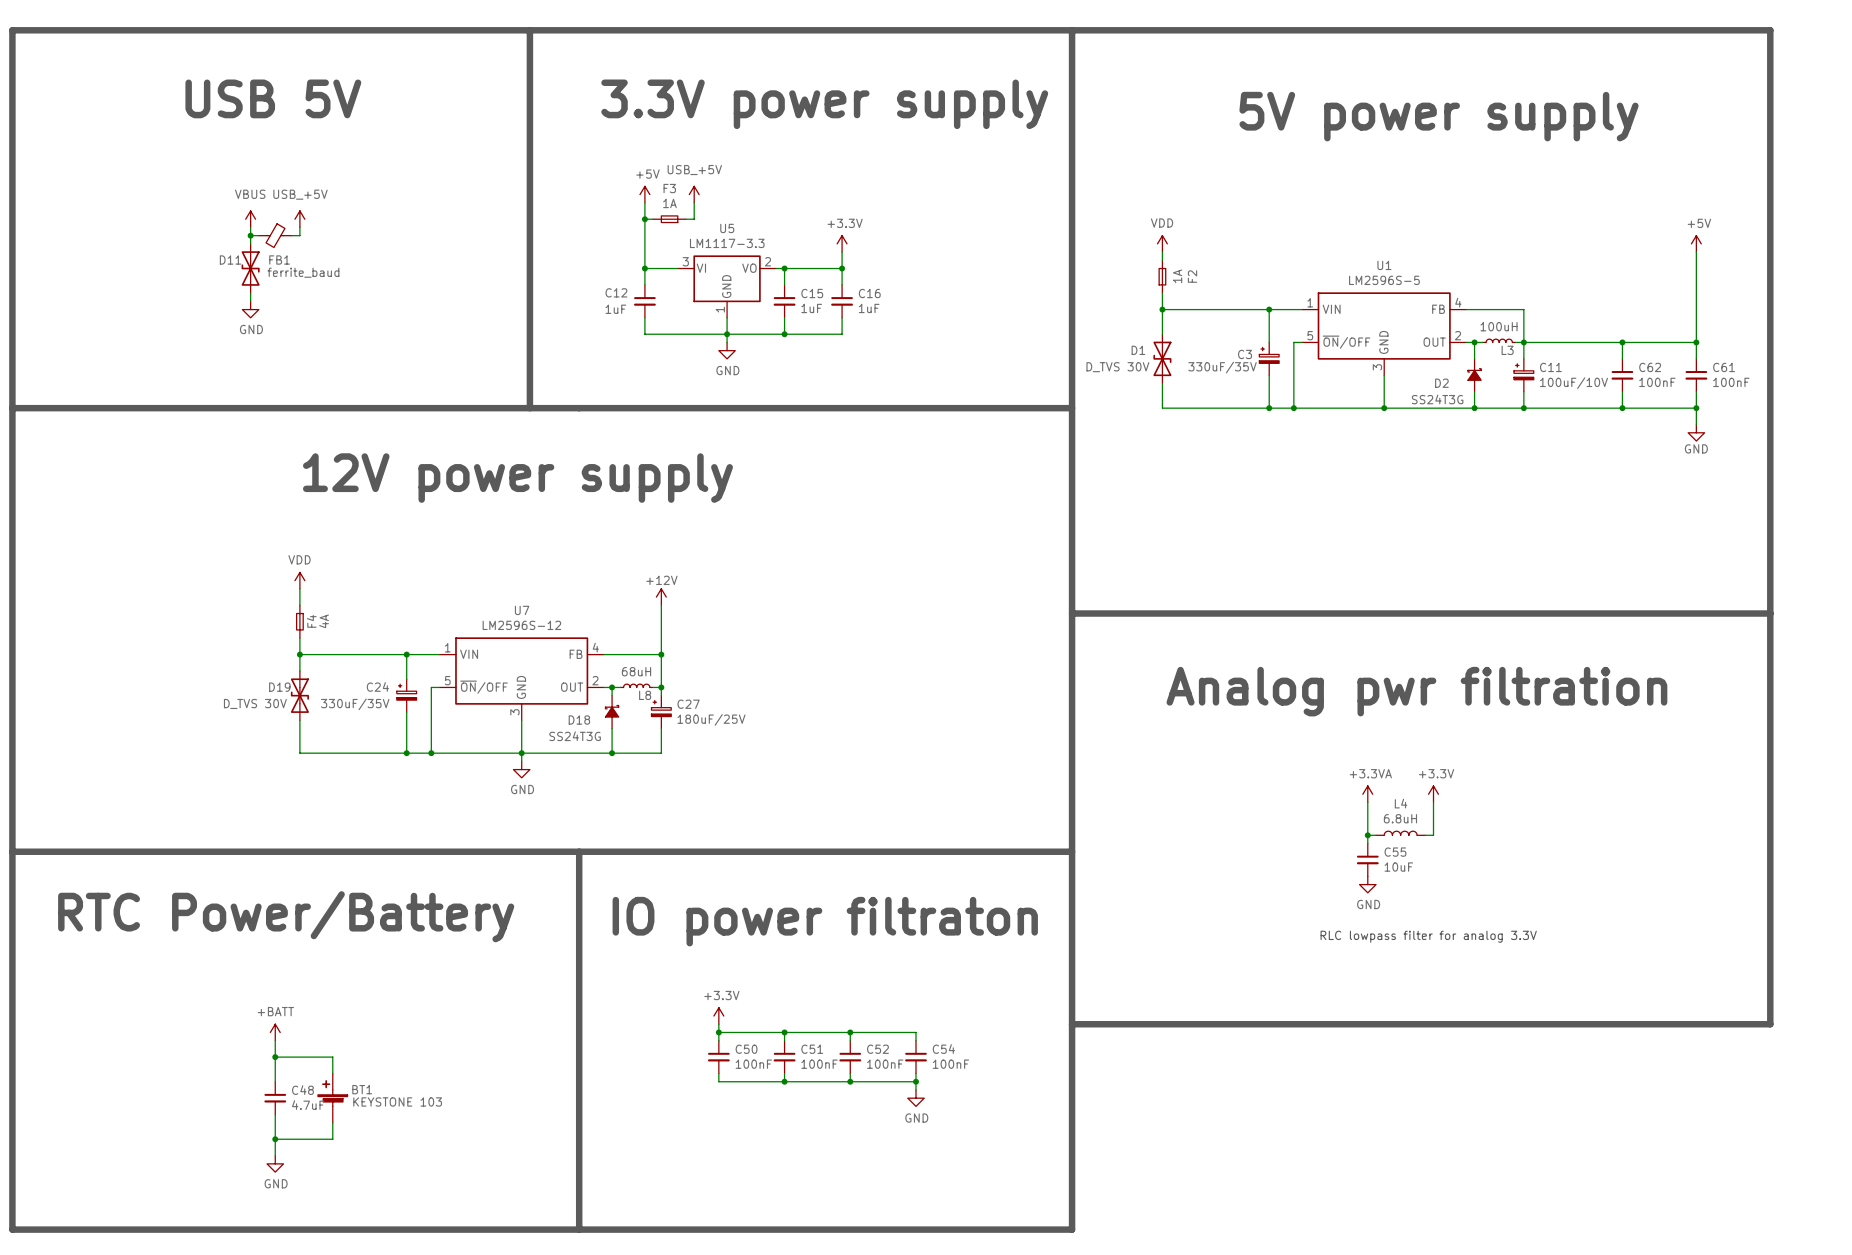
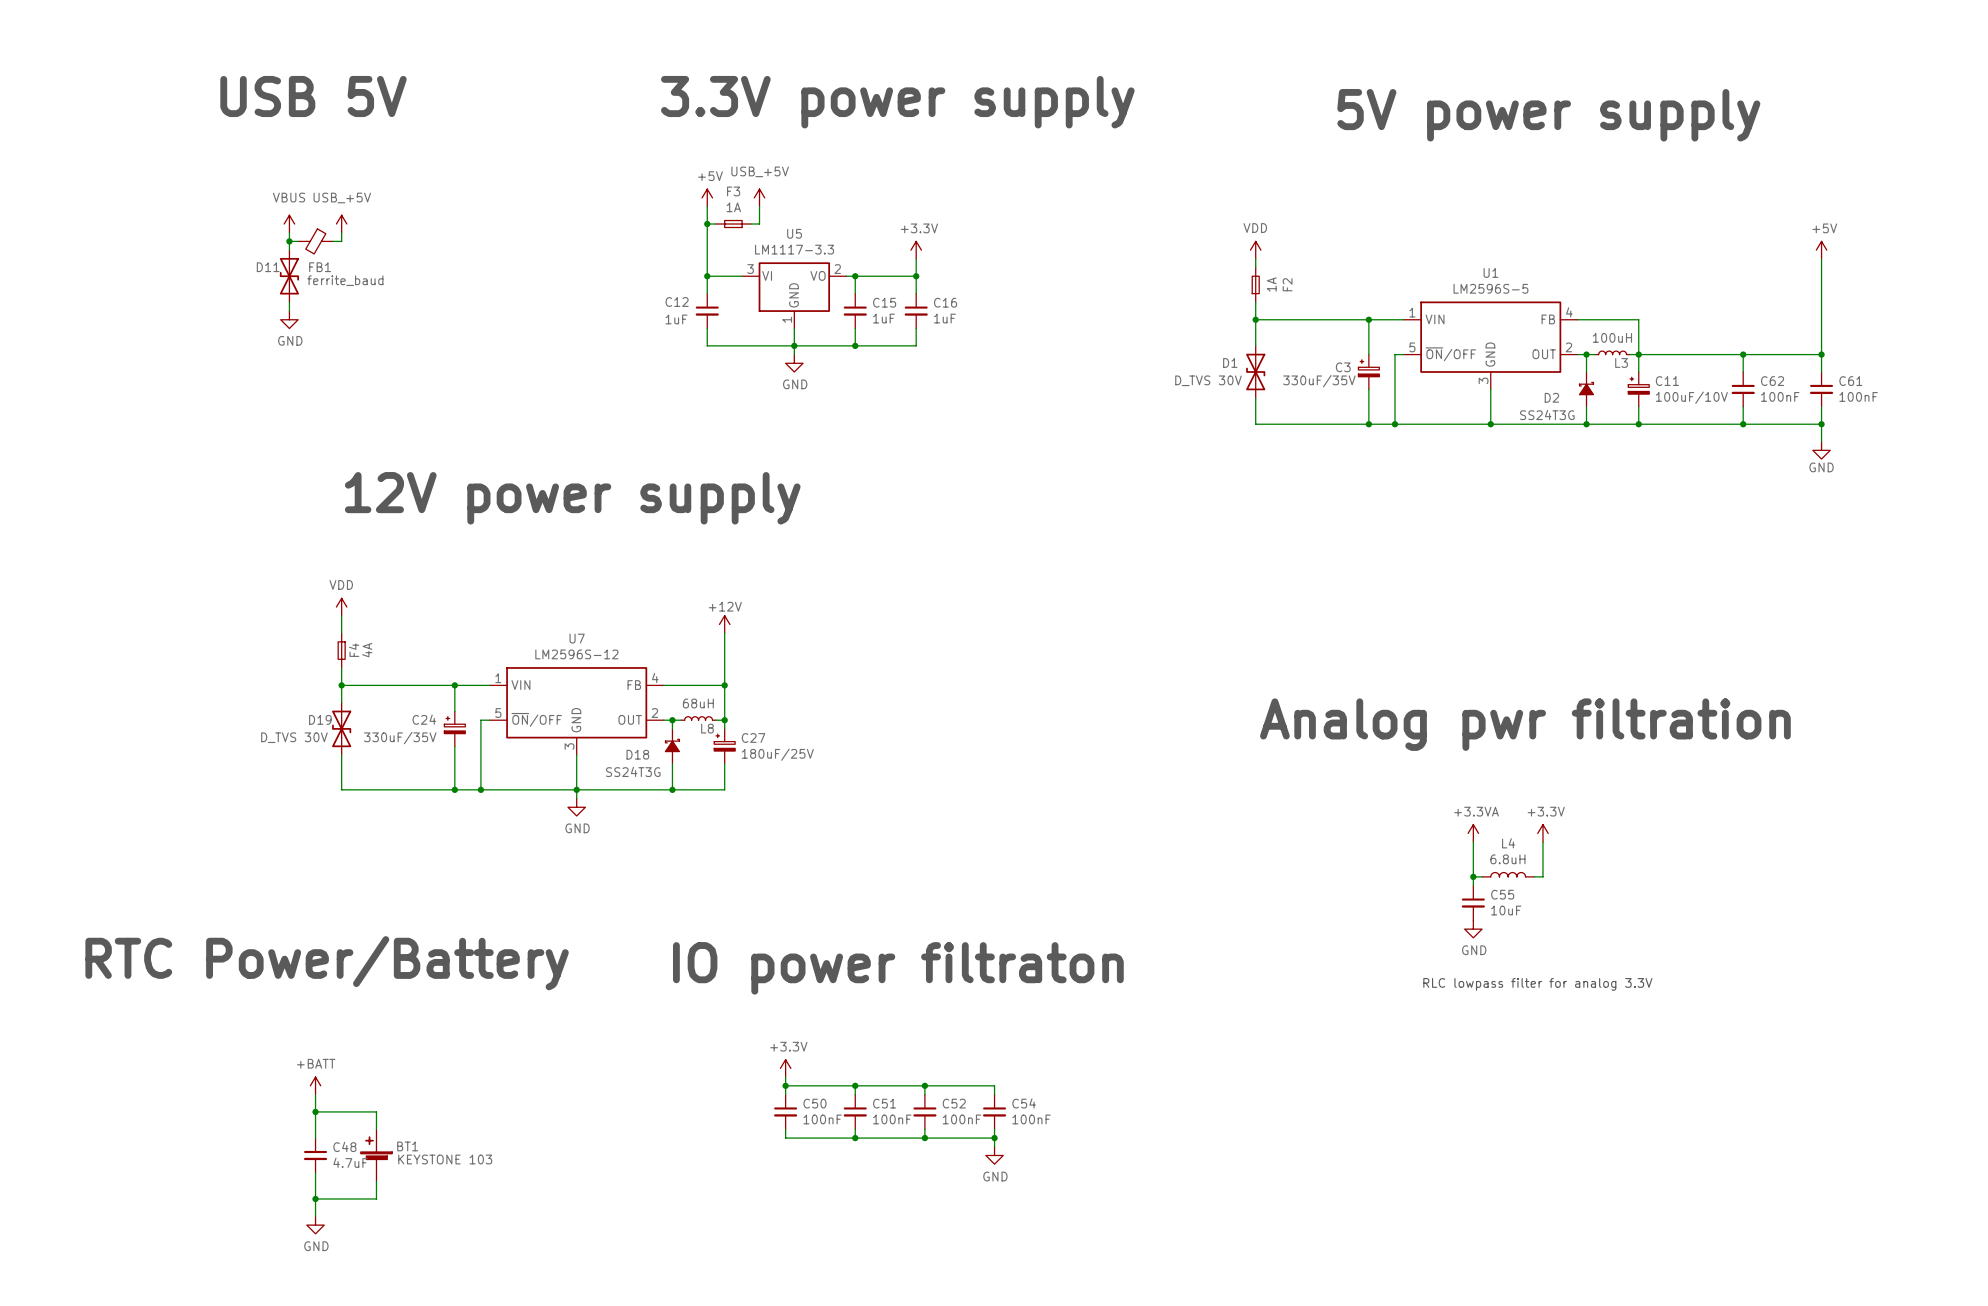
line: (529, 30) (529, 408) -> none
line: (1072, 30) (1072, 1229) (12, 1229) (12, 30) (1770, 30) (1770, 1024) (1072, 1024) -> none
line: (12, 408) (1072, 408) -> none
line: (1072, 613) (1770, 613) -> none
line: (12, 851) (1072, 851) -> none
line: (579, 851) (579, 1229) -> none

